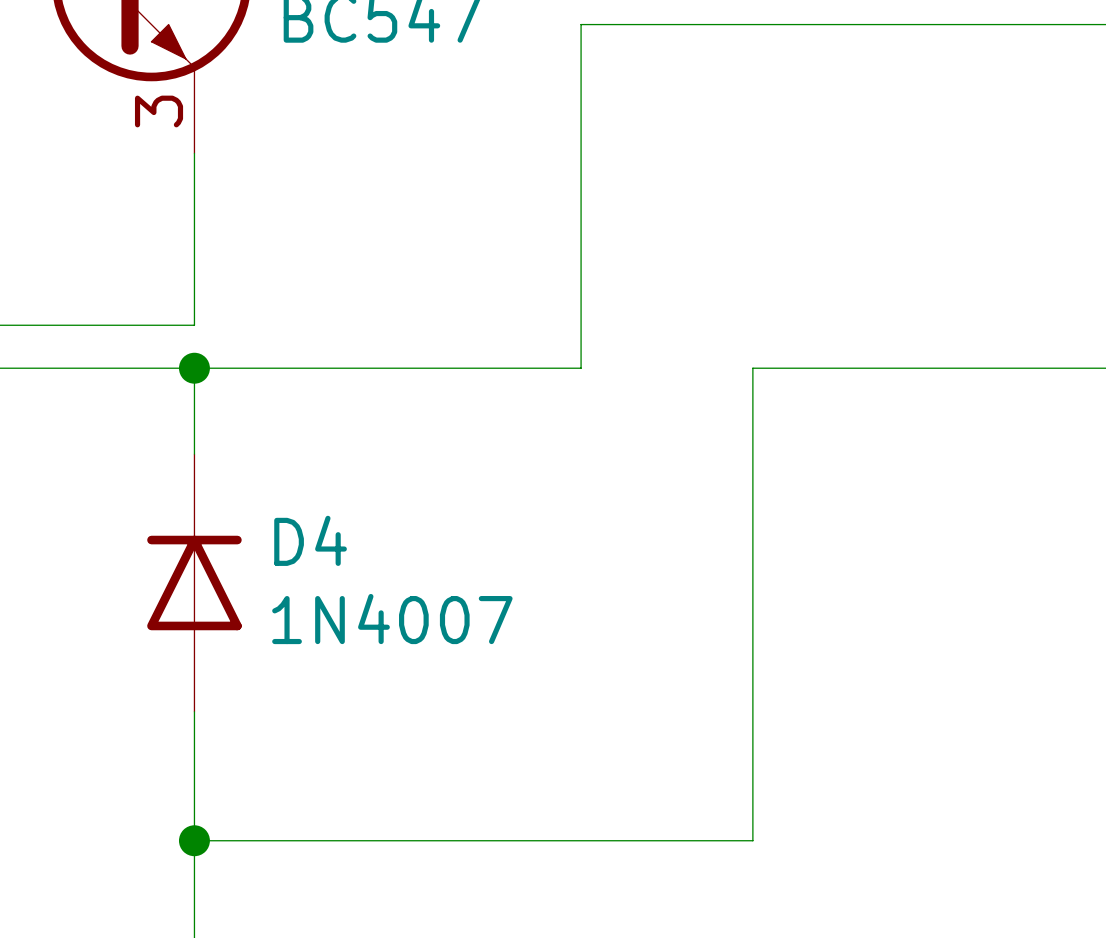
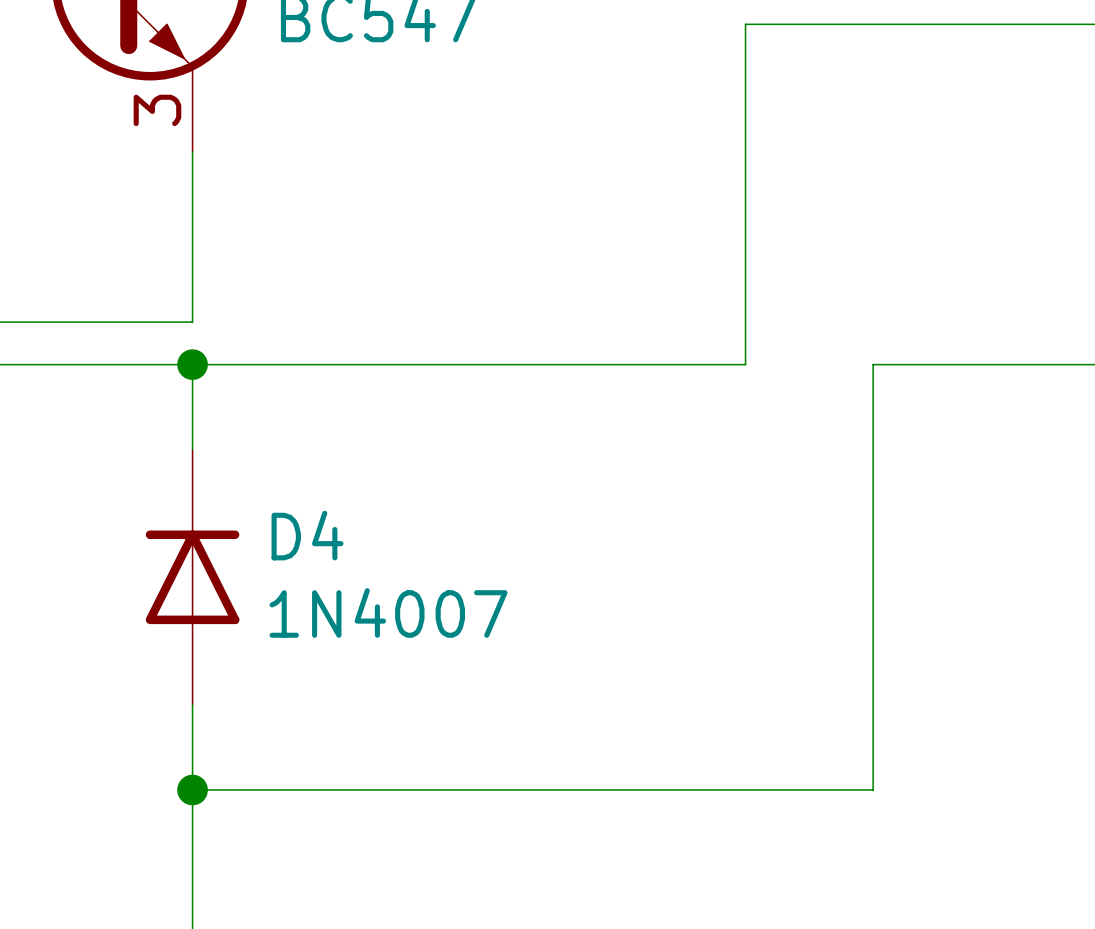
wire: (752, 24) (581, 24) (581, 368) -> (745, 24) (745, 364) (575, 364)
wire: (881, 368) (752, 368) (752, 840) (194, 840) -> (873, 364) (873, 789) (192, 789)
junction position: (194, 840) -> (192, 789)

